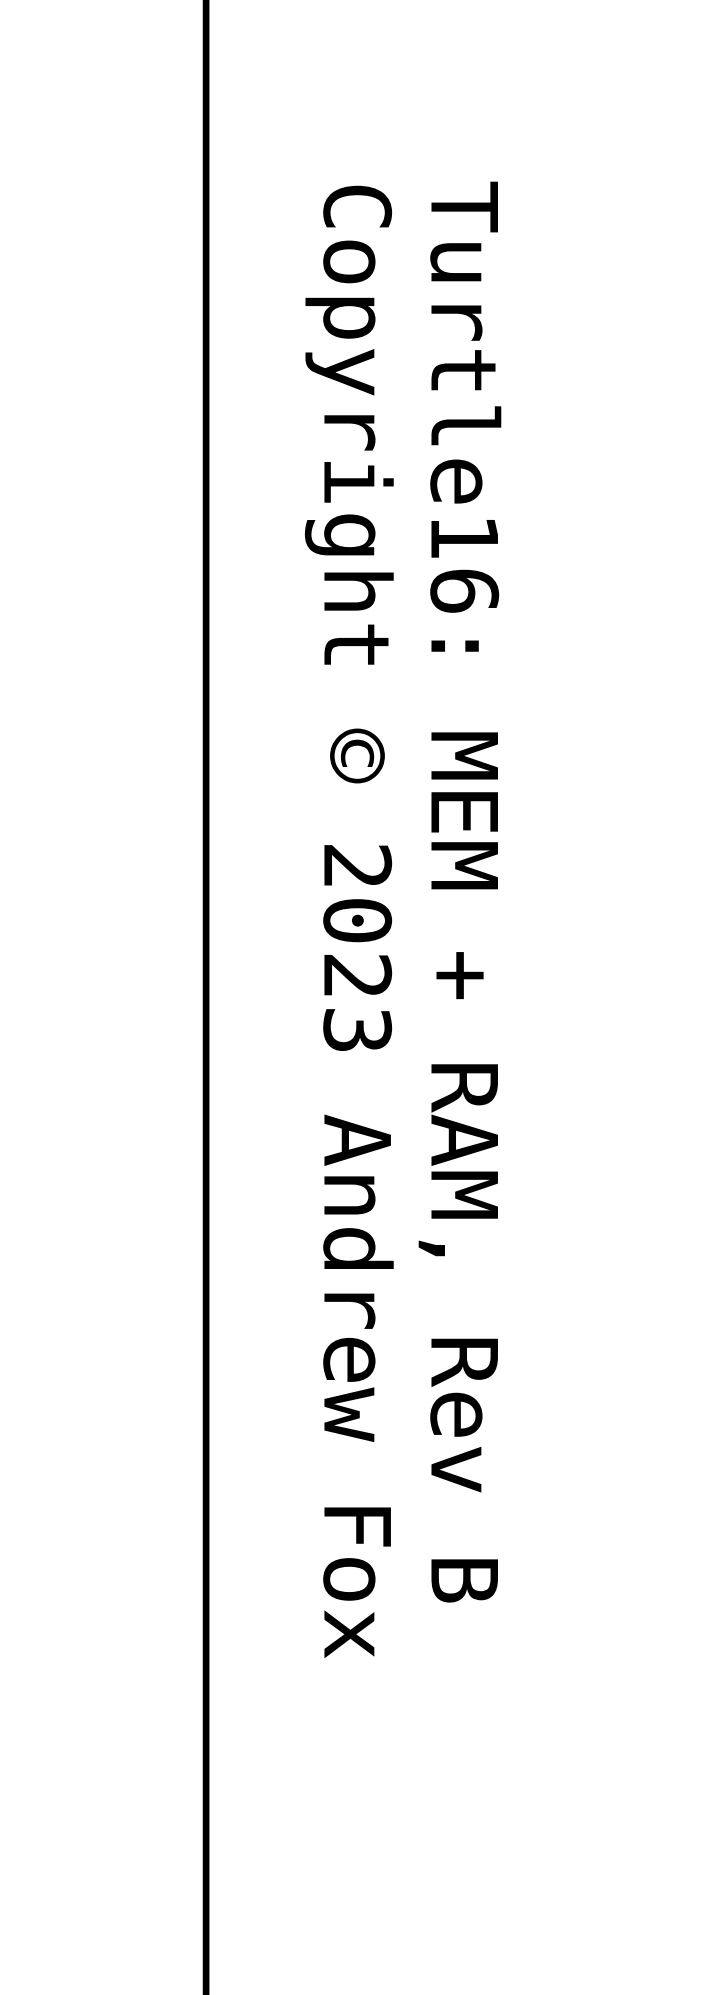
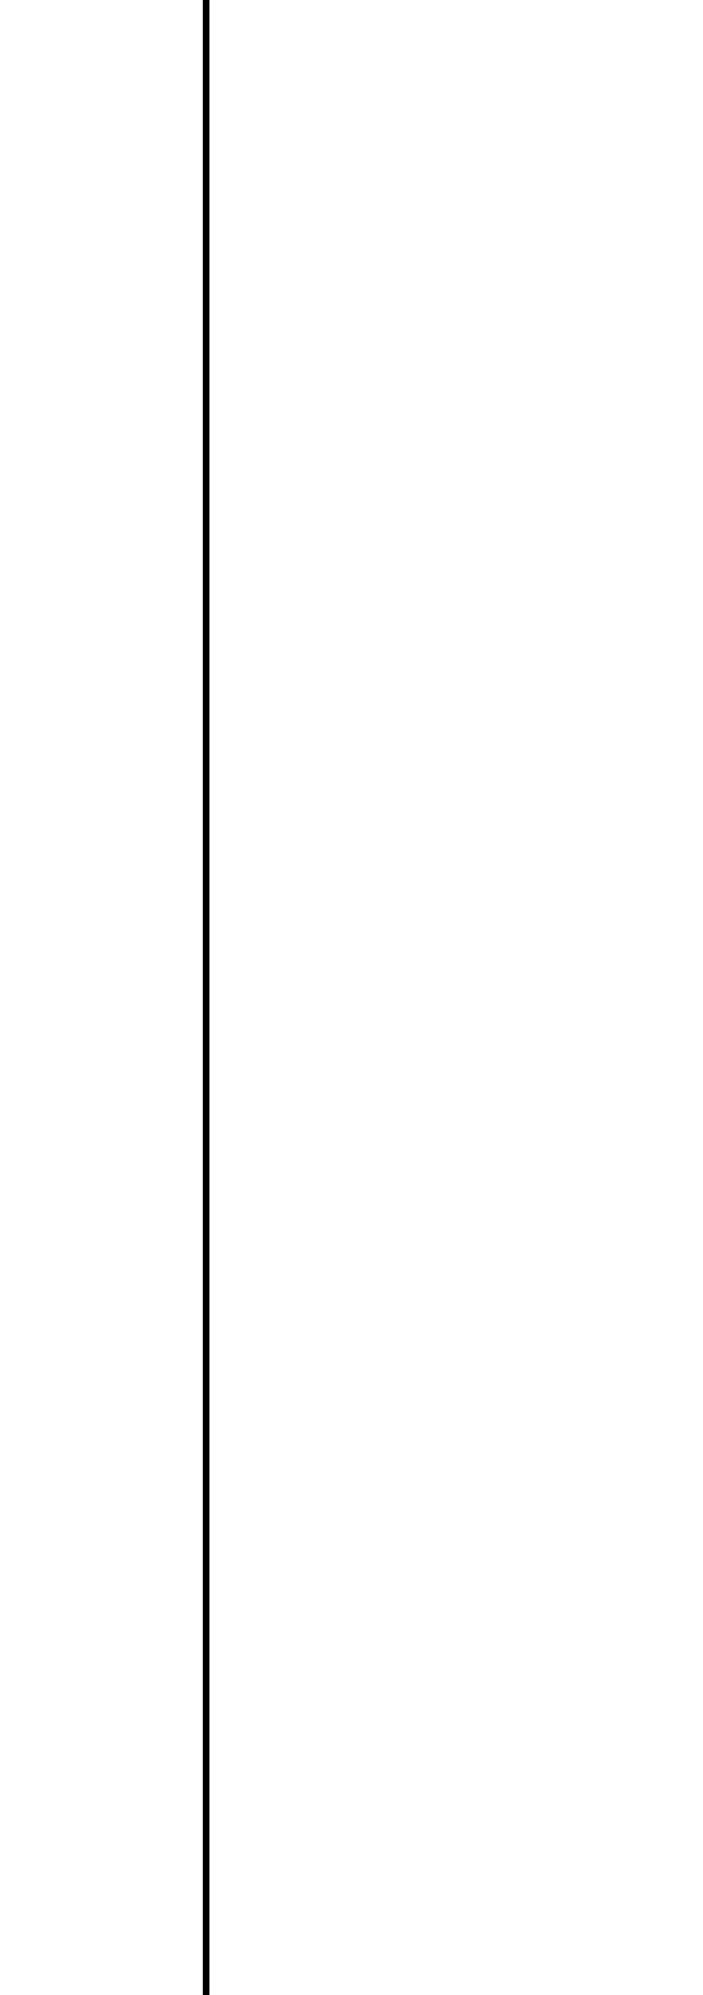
text: Turtle16: MEM + RAM, Rev B (459, 892) -> none
text: Copyright © 2023 Andrew Fox (349, 922) -> none

